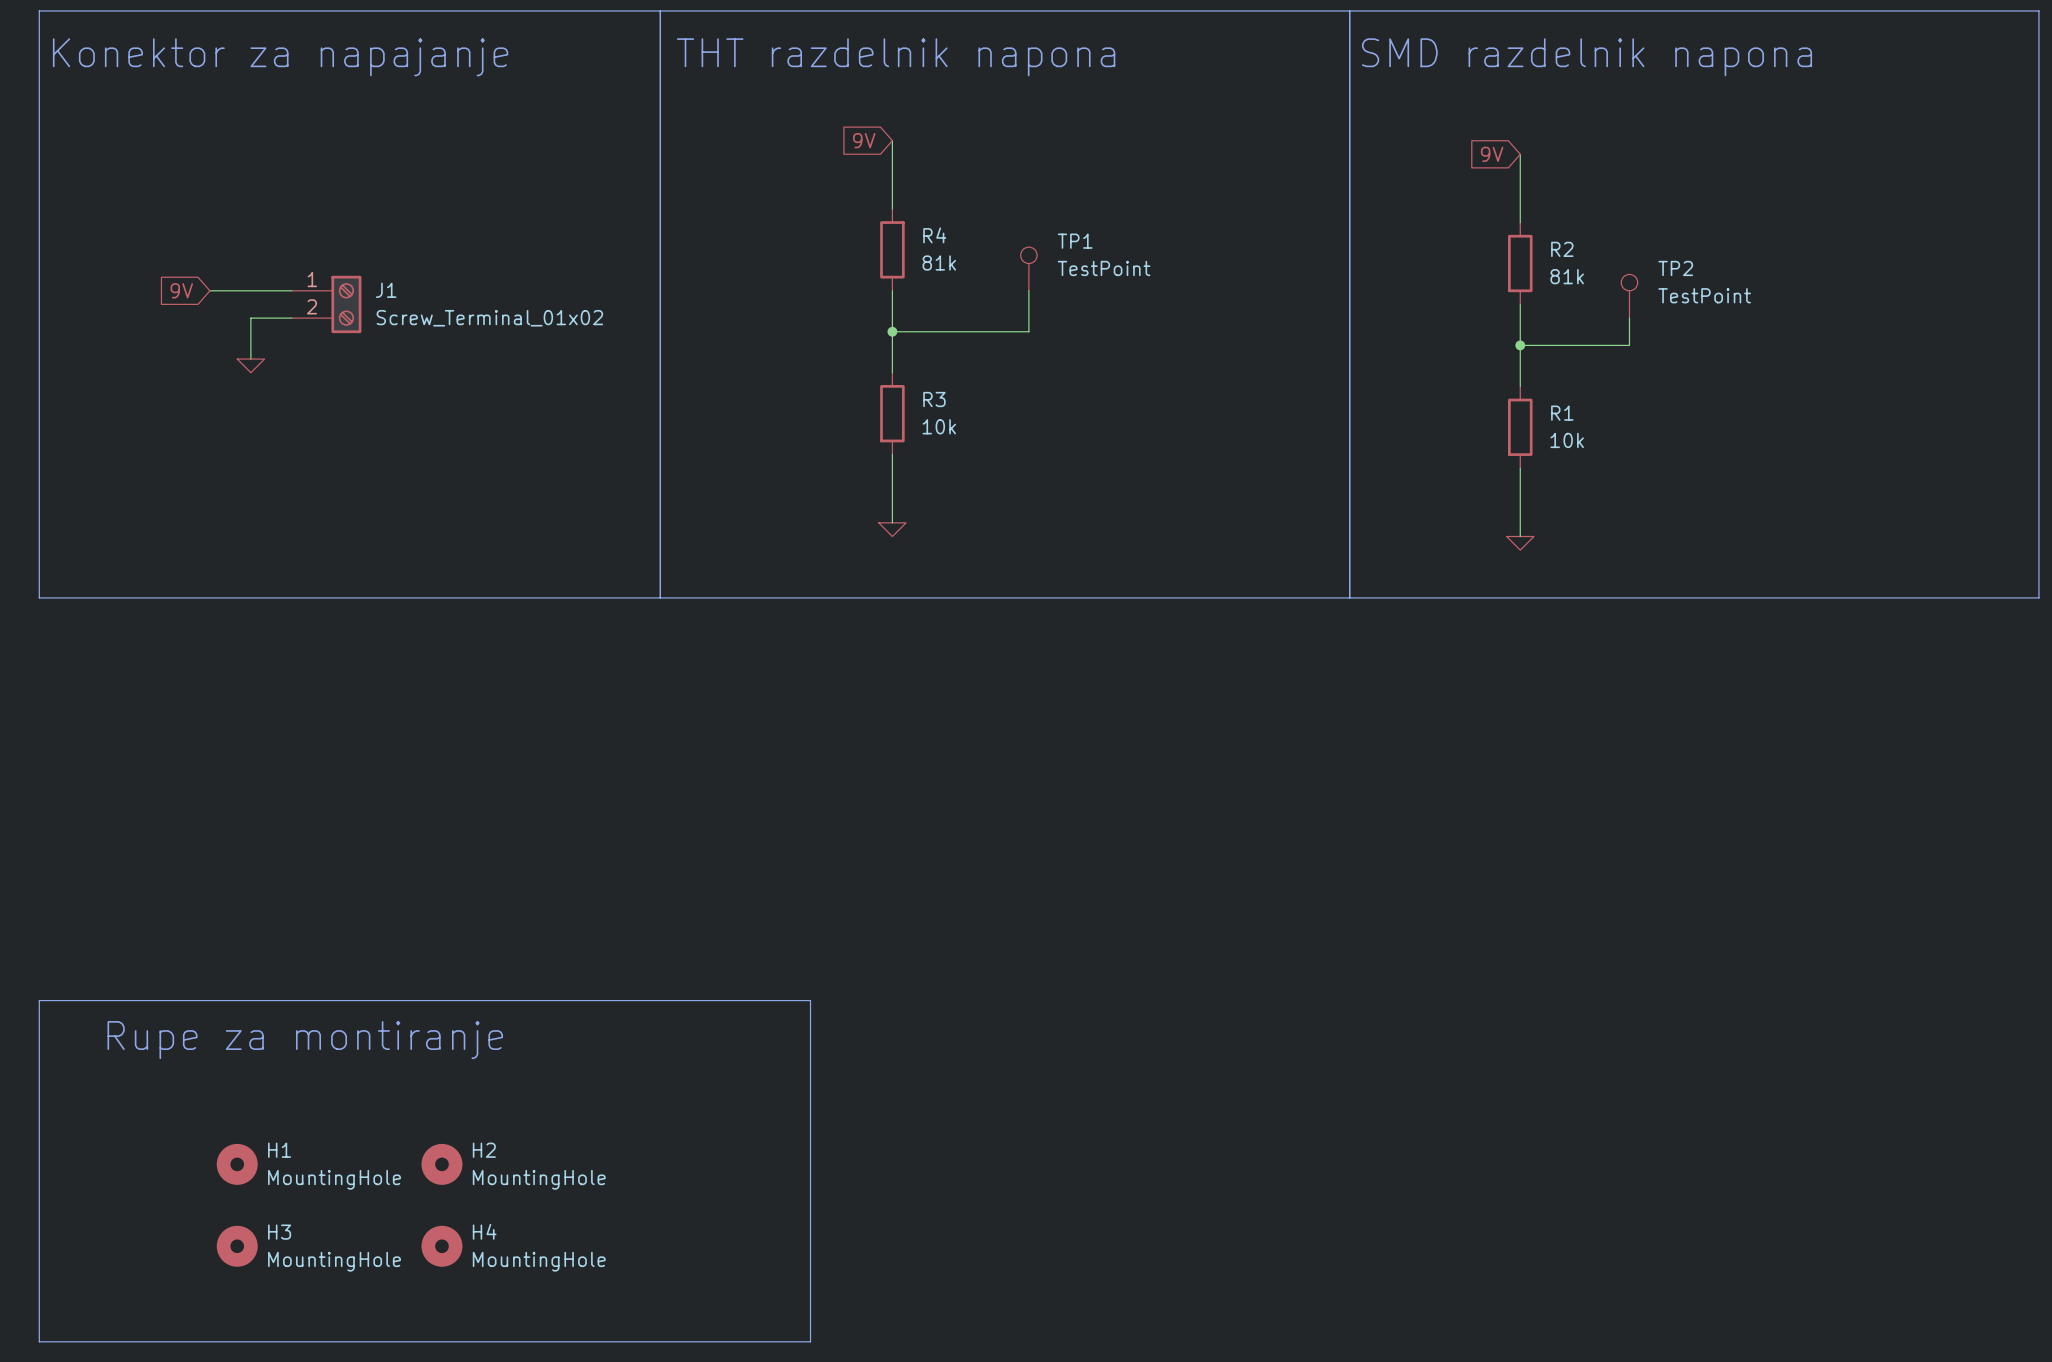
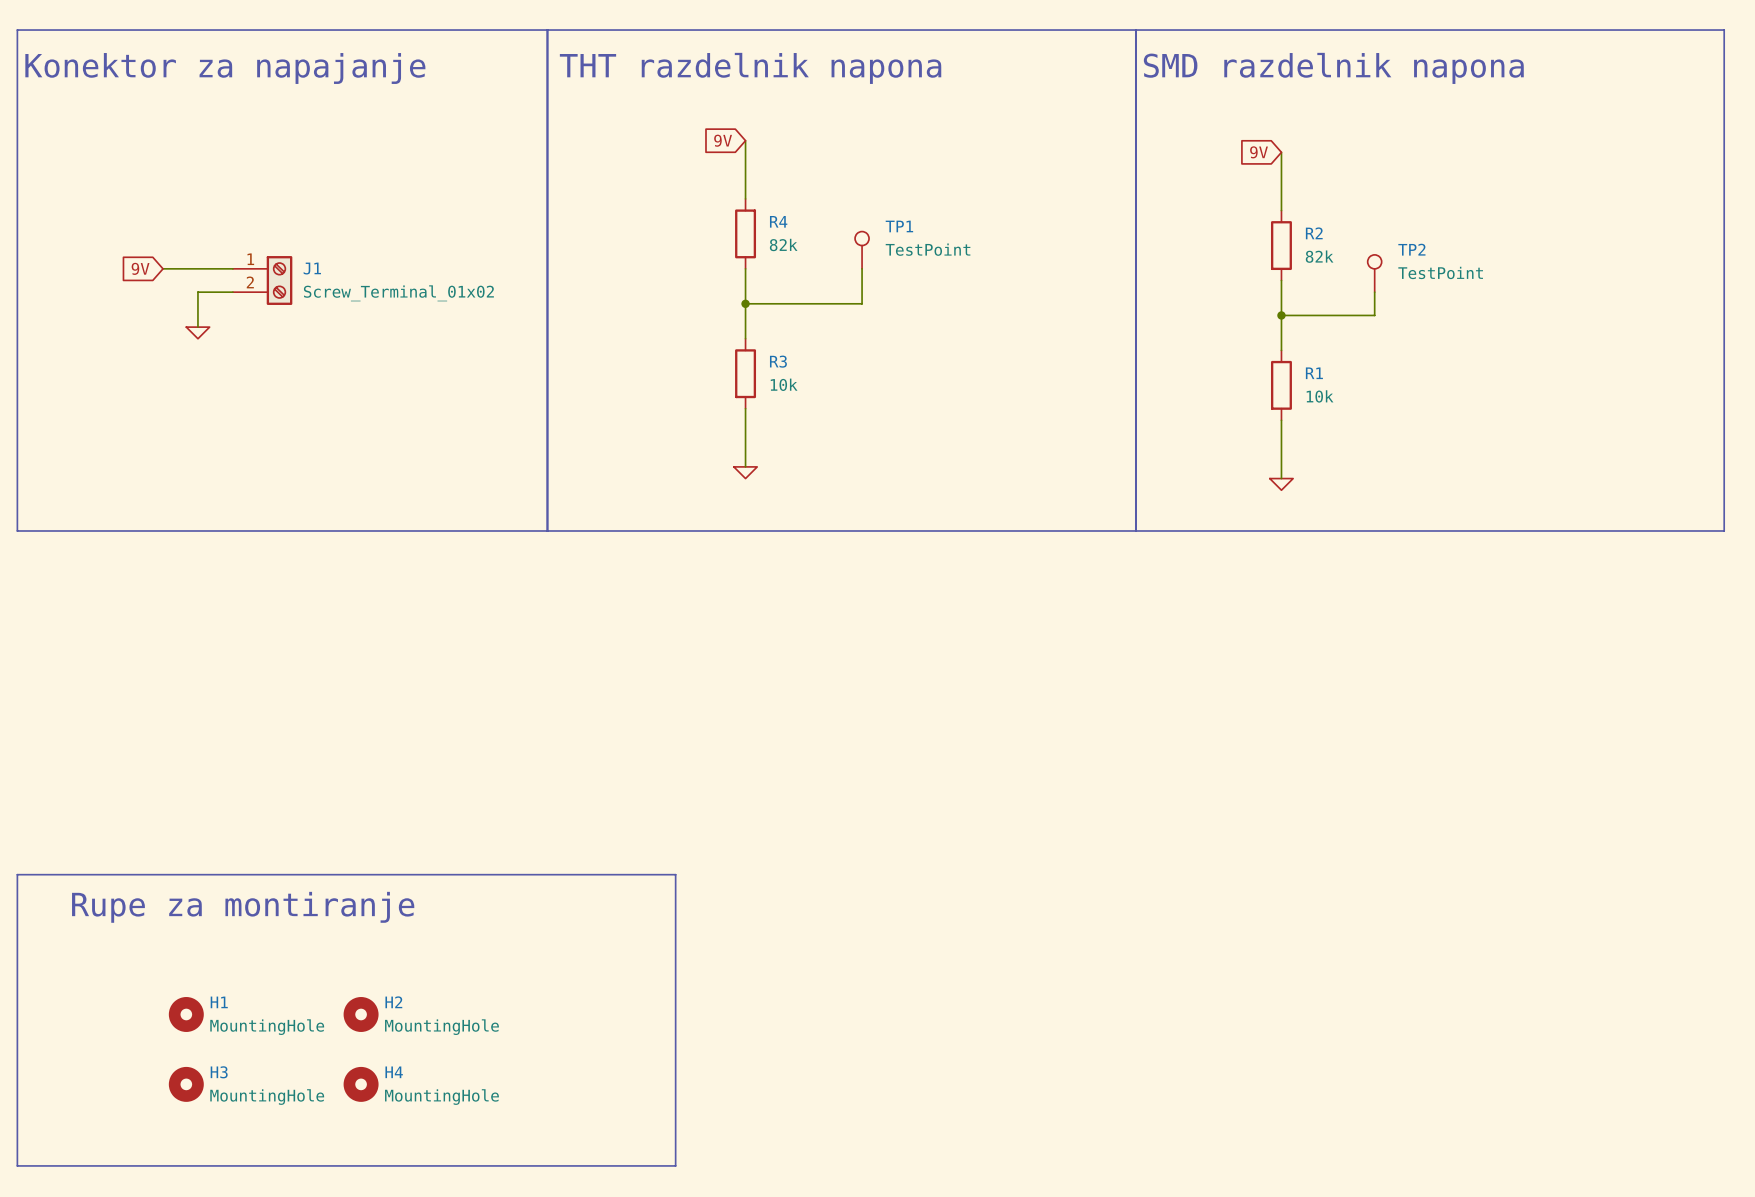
R4 value: 81k (939, 263) -> 82k (783, 244)
R2 value: 81k (1567, 276) -> 82k (1319, 256)

